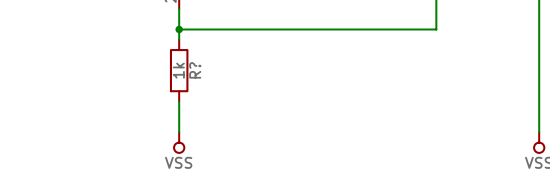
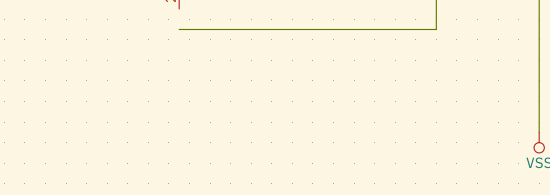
wire: (179, 8) (179, 39) -> none
junction: (179, 29) -> none
R?: 1k (179, 70) -> none
wire: (179, 101) (179, 132) -> none
power symbol: VSS (179, 142) -> none

